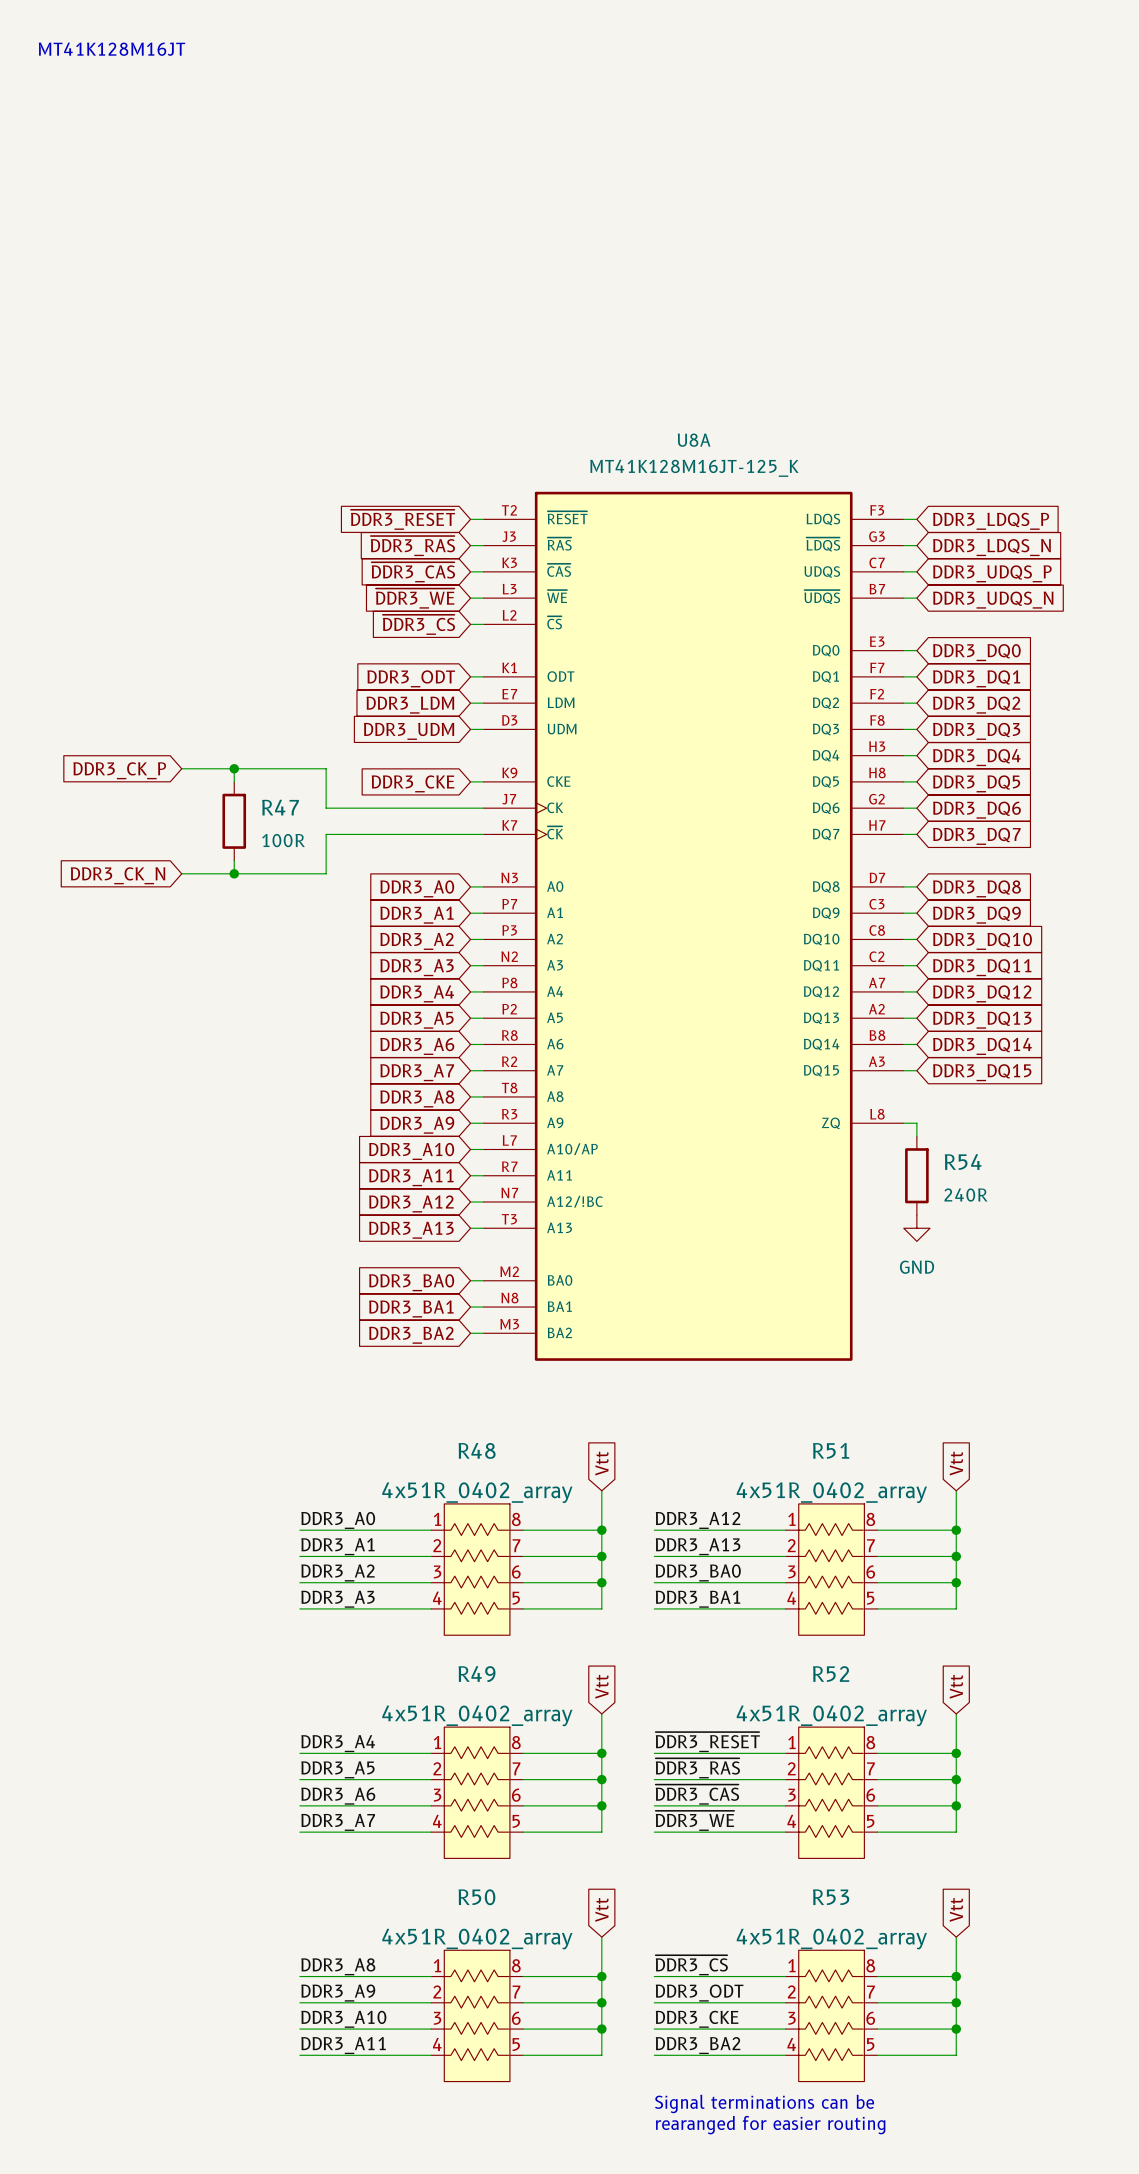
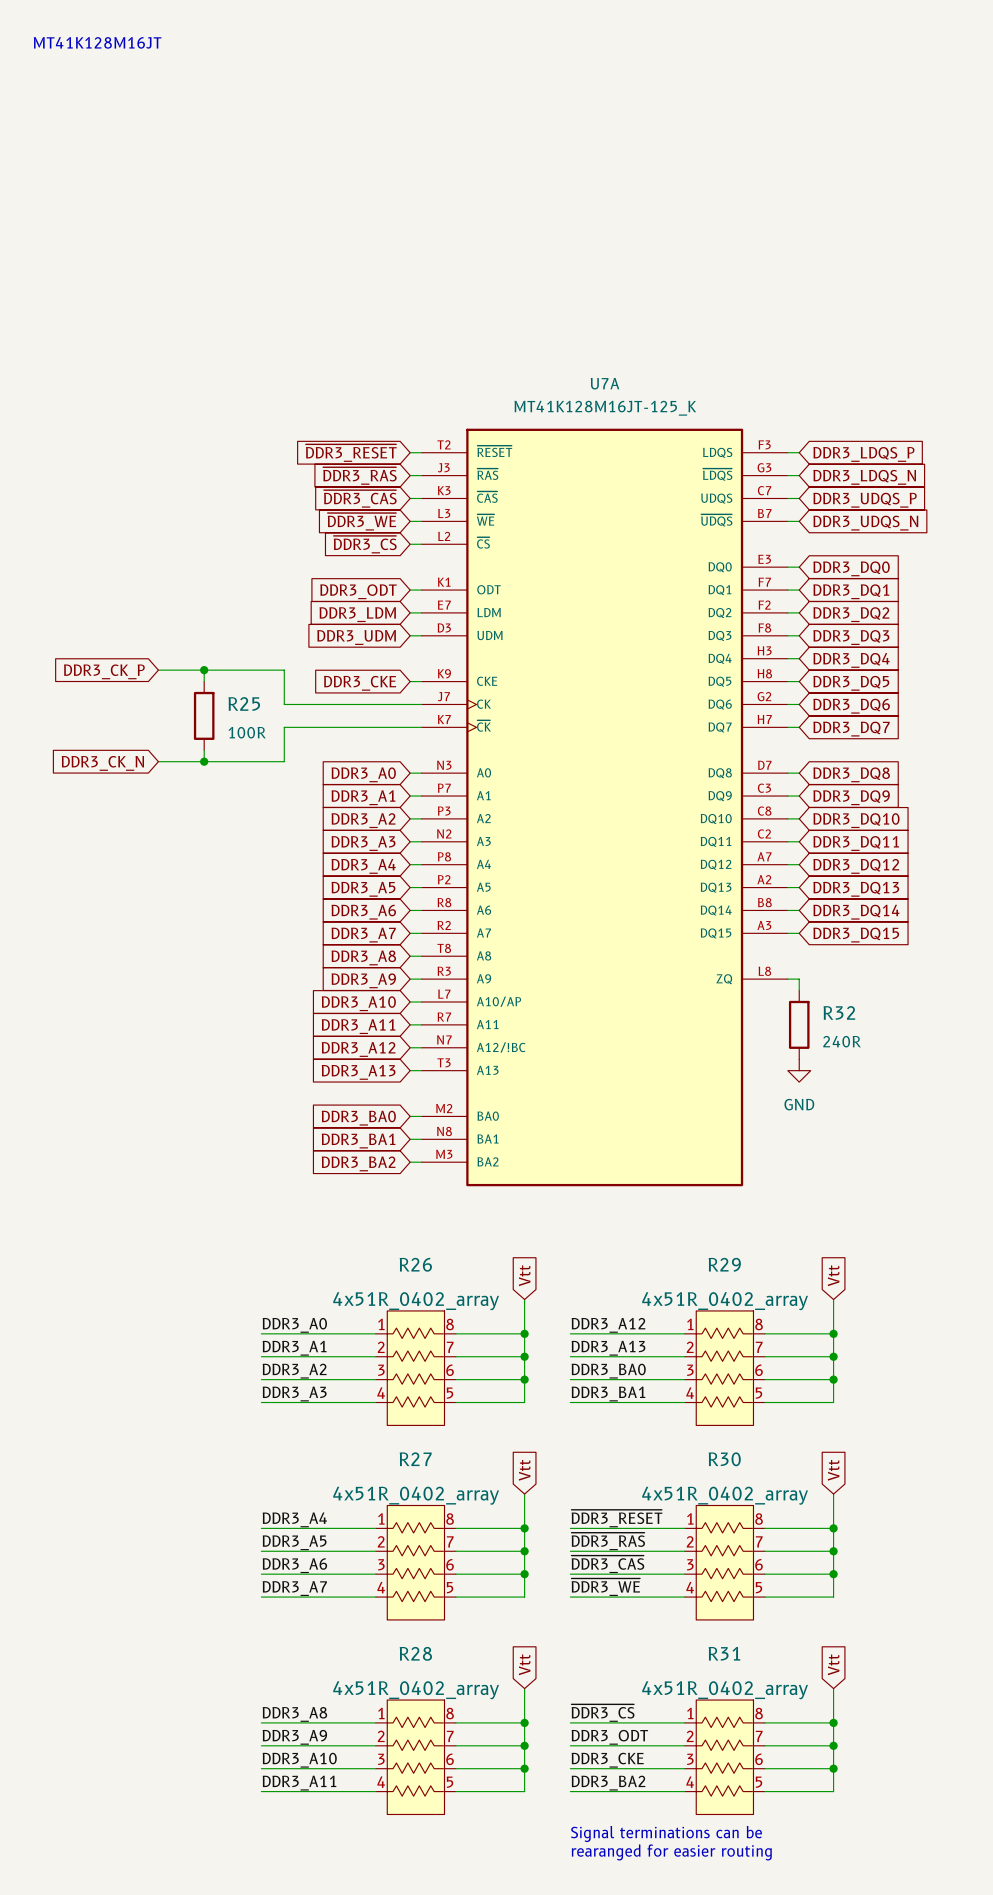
U8A name: U8A (694, 440) -> U7A (605, 383)
R47 name: R47 (280, 807) -> R25 (244, 703)
R54 name: R54 (963, 1162) -> R32 (839, 1012)
R48 name: R48 (477, 1450) -> R26 (415, 1264)
R51 name: R51 (831, 1450) -> R29 (724, 1264)
R49 name: R49 (476, 1674) -> R27 (415, 1459)
R52 name: R52 (831, 1674) -> R30 (724, 1459)
R50 name: R50 (476, 1897) -> R28 (415, 1653)
R53 name: R53 (831, 1897) -> R31 (724, 1653)

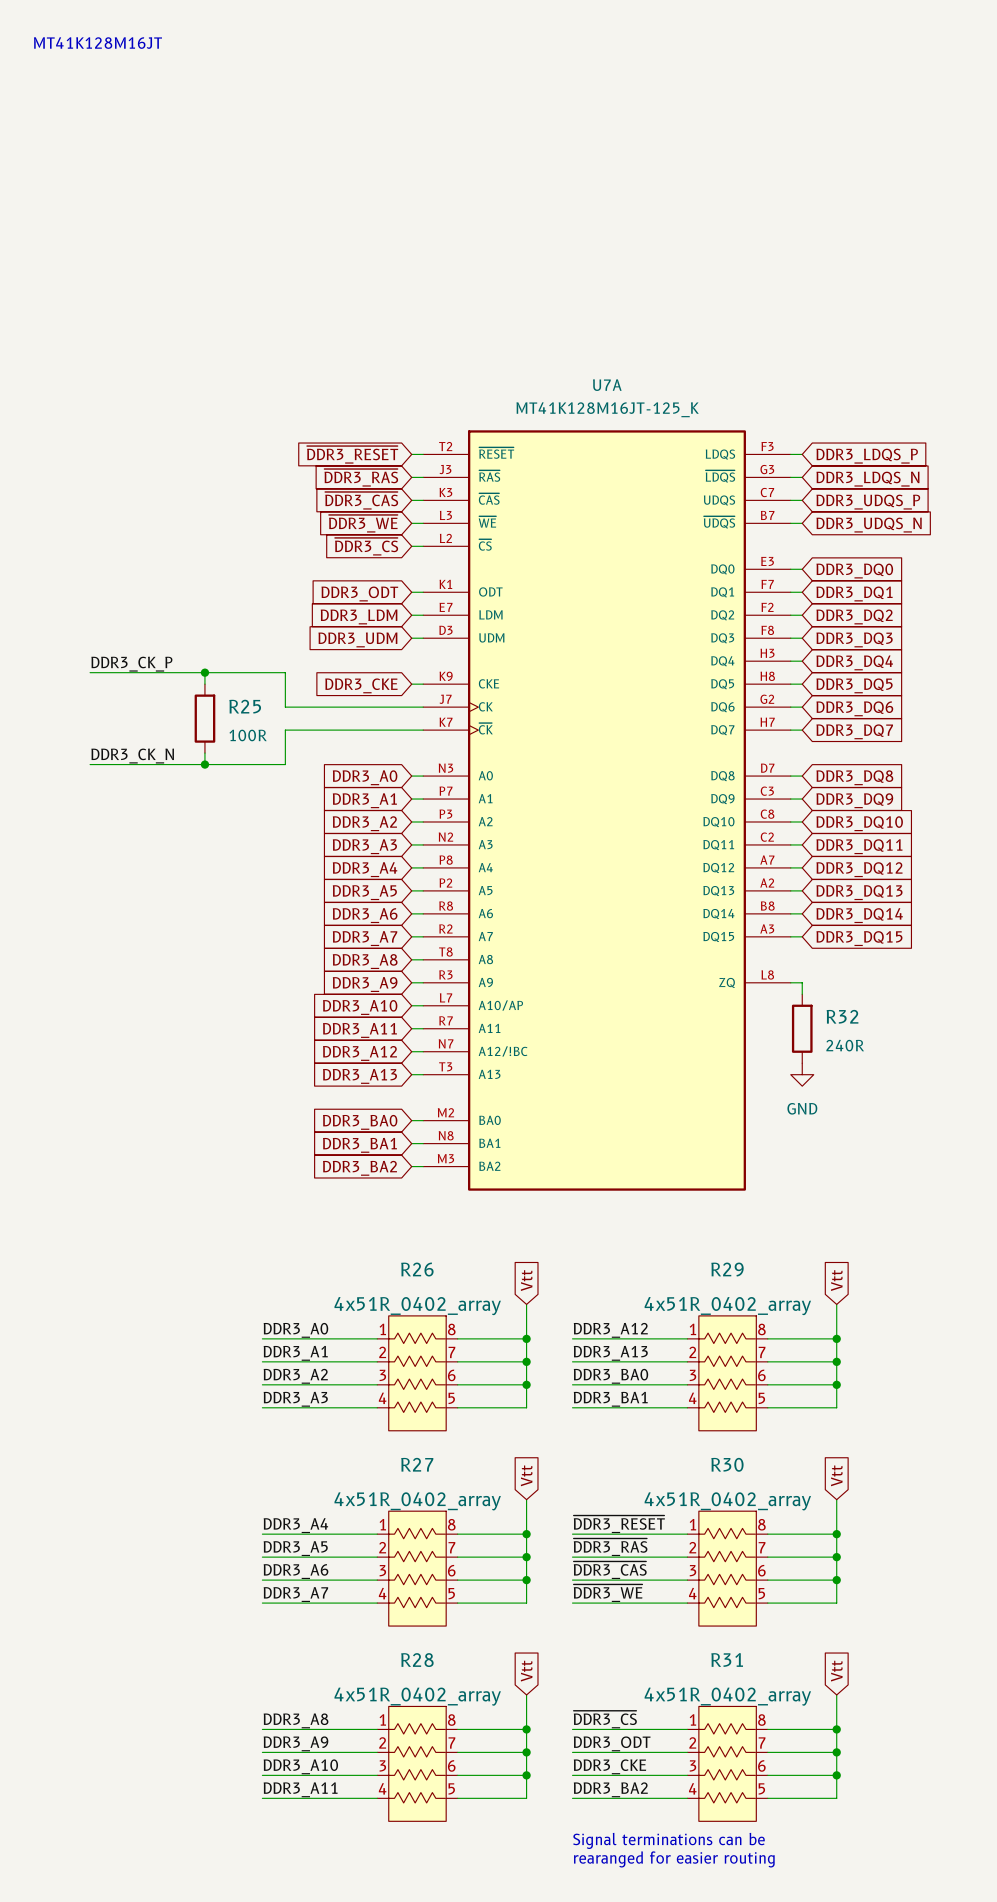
label: none -> DDR3_CK_P (131, 664)
wire: none -> (90, 672) (159, 672)
global label: DDR3_CK_P (104, 671) -> none
label: none -> DDR3_CK_N (132, 756)
wire: none -> (90, 764) (159, 764)
global label: DDR3_CK_N (102, 763) -> none

